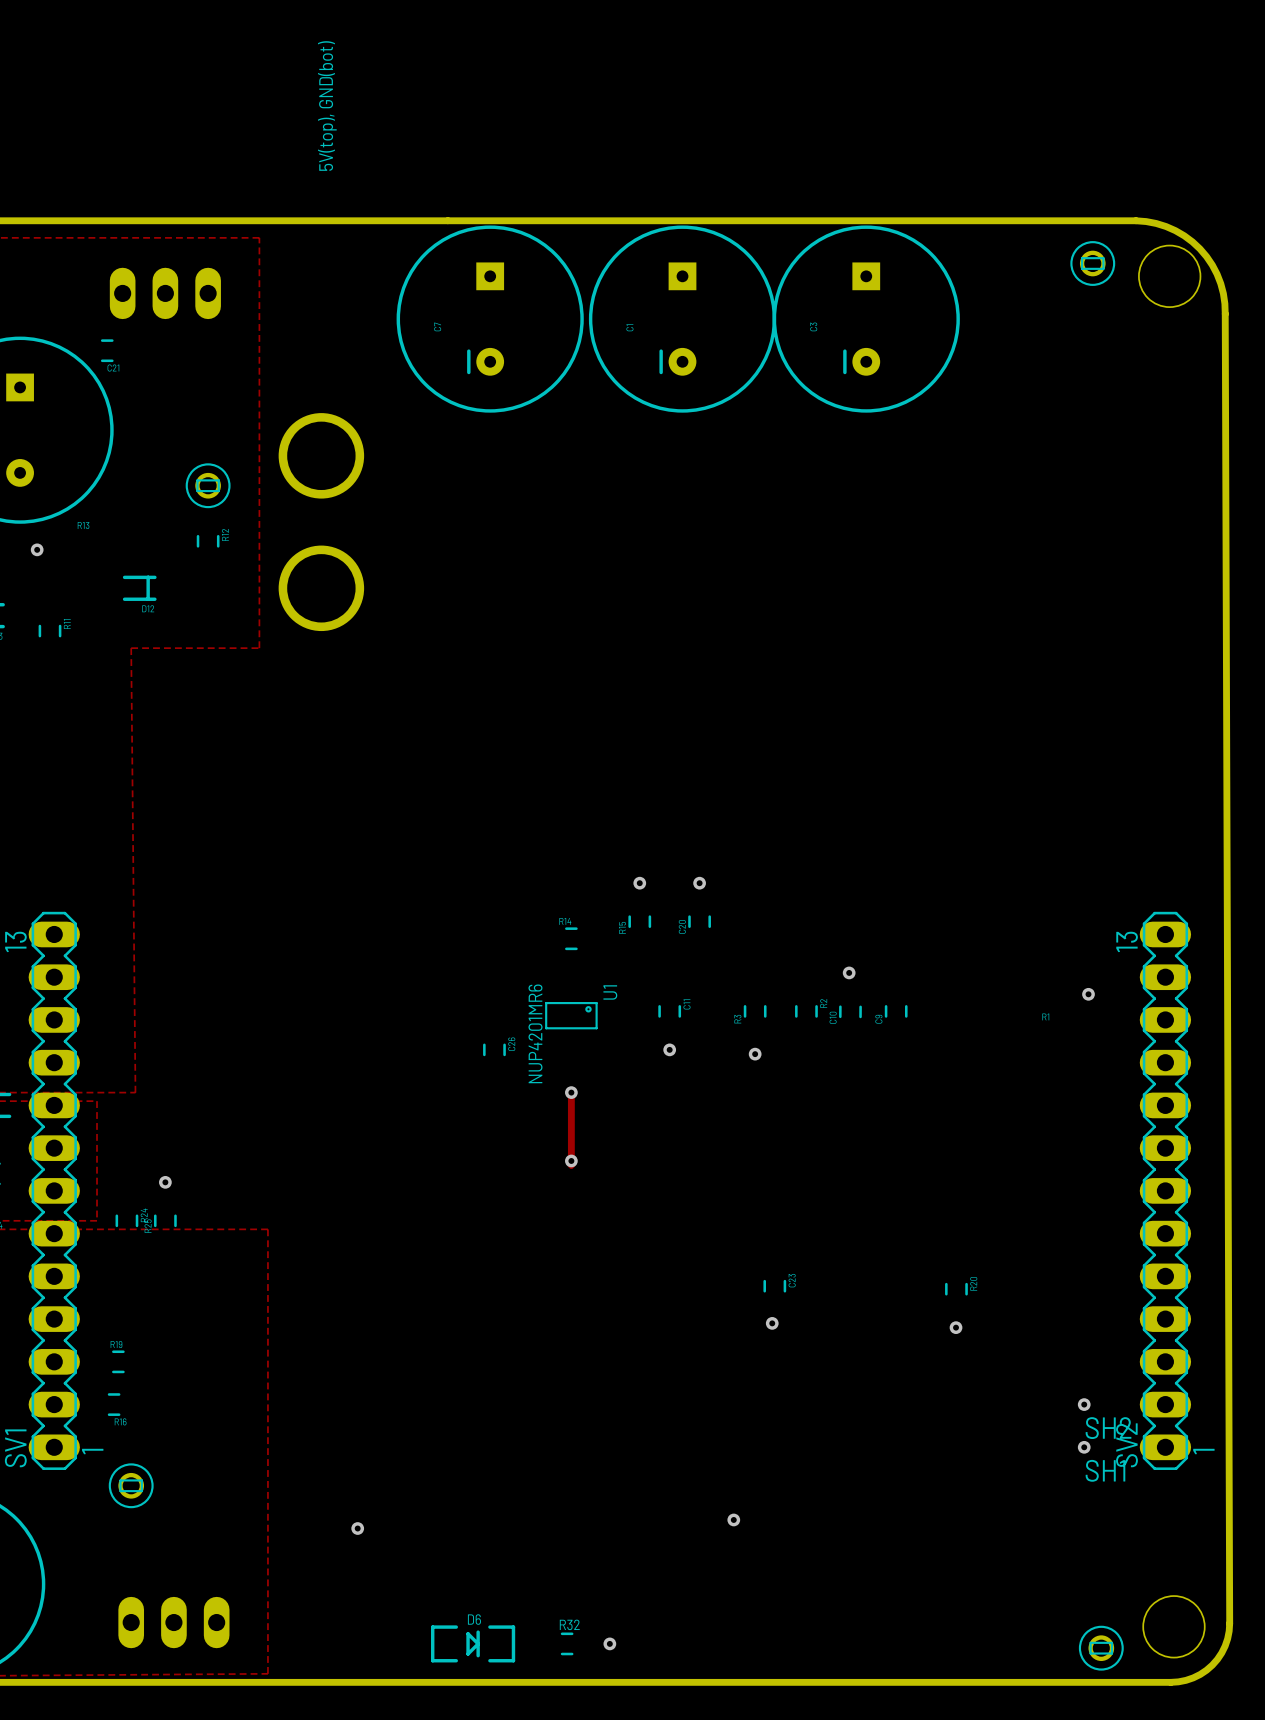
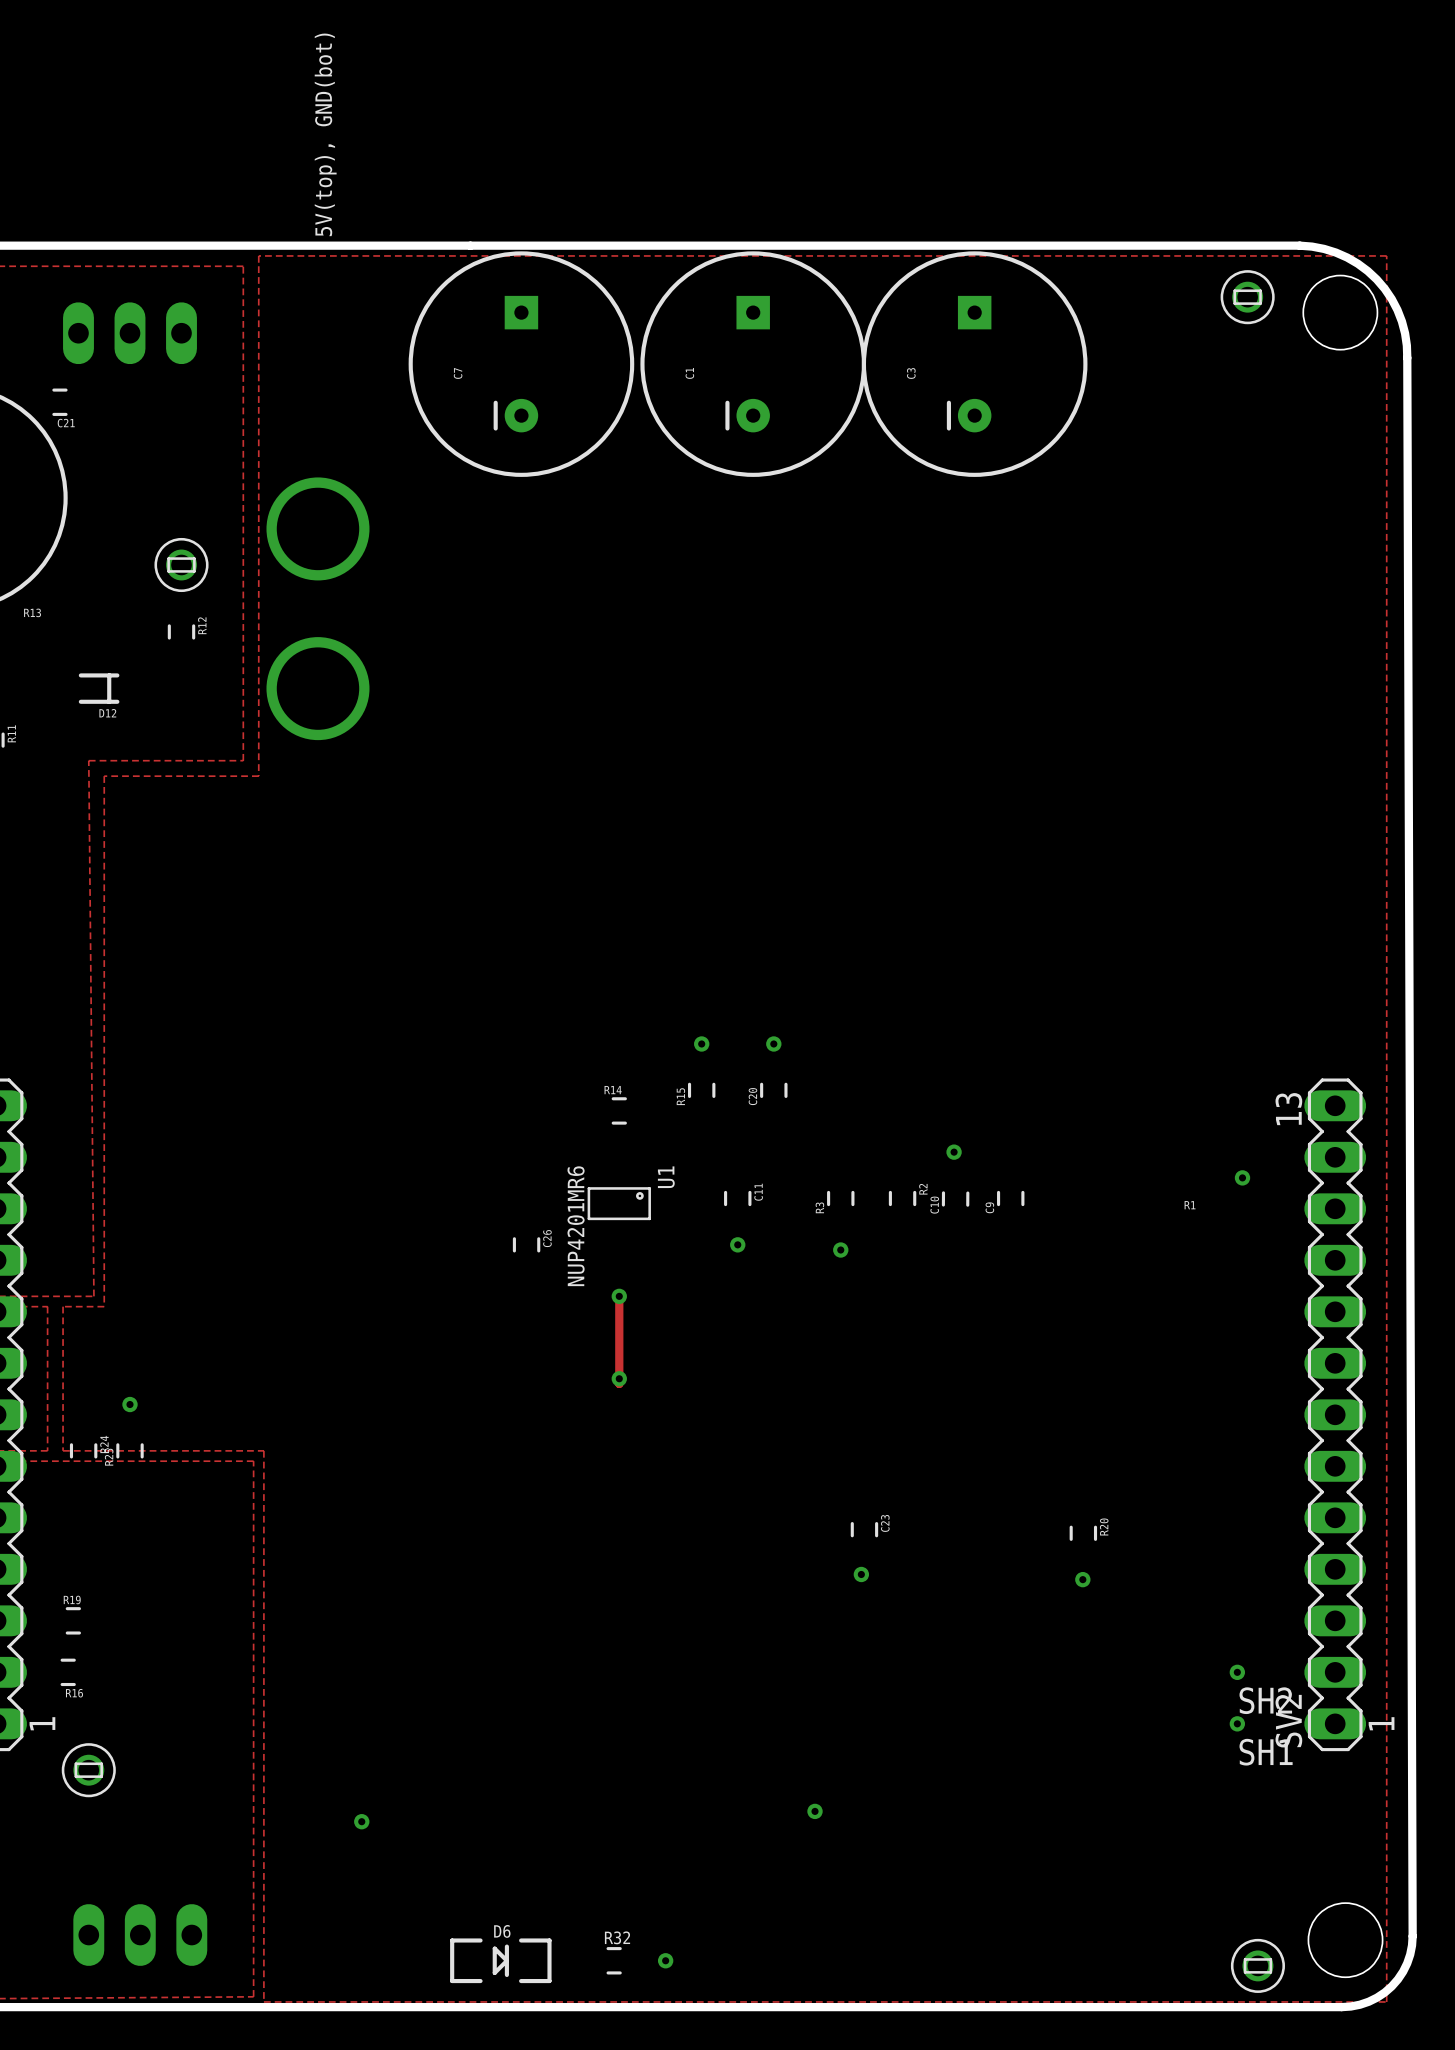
zone outline: none -> (258, 255) (258, 776) (104, 776) (104, 1306) (63, 1306) (63, 1450) (263, 1450) (263, 2001) (1386, 2001) (1386, 255) (258, 255)

